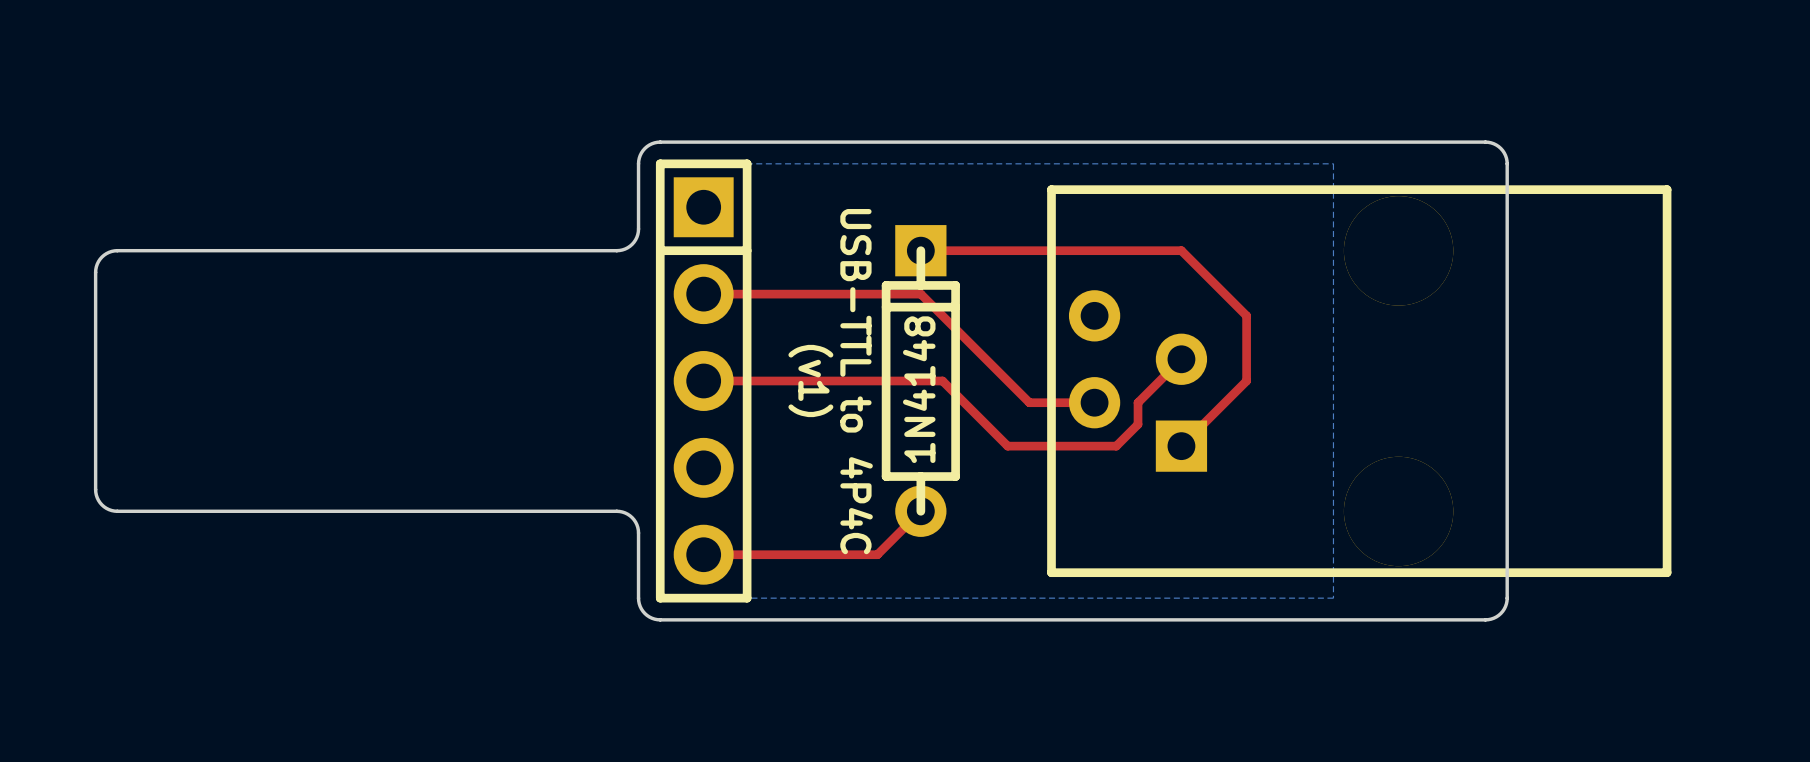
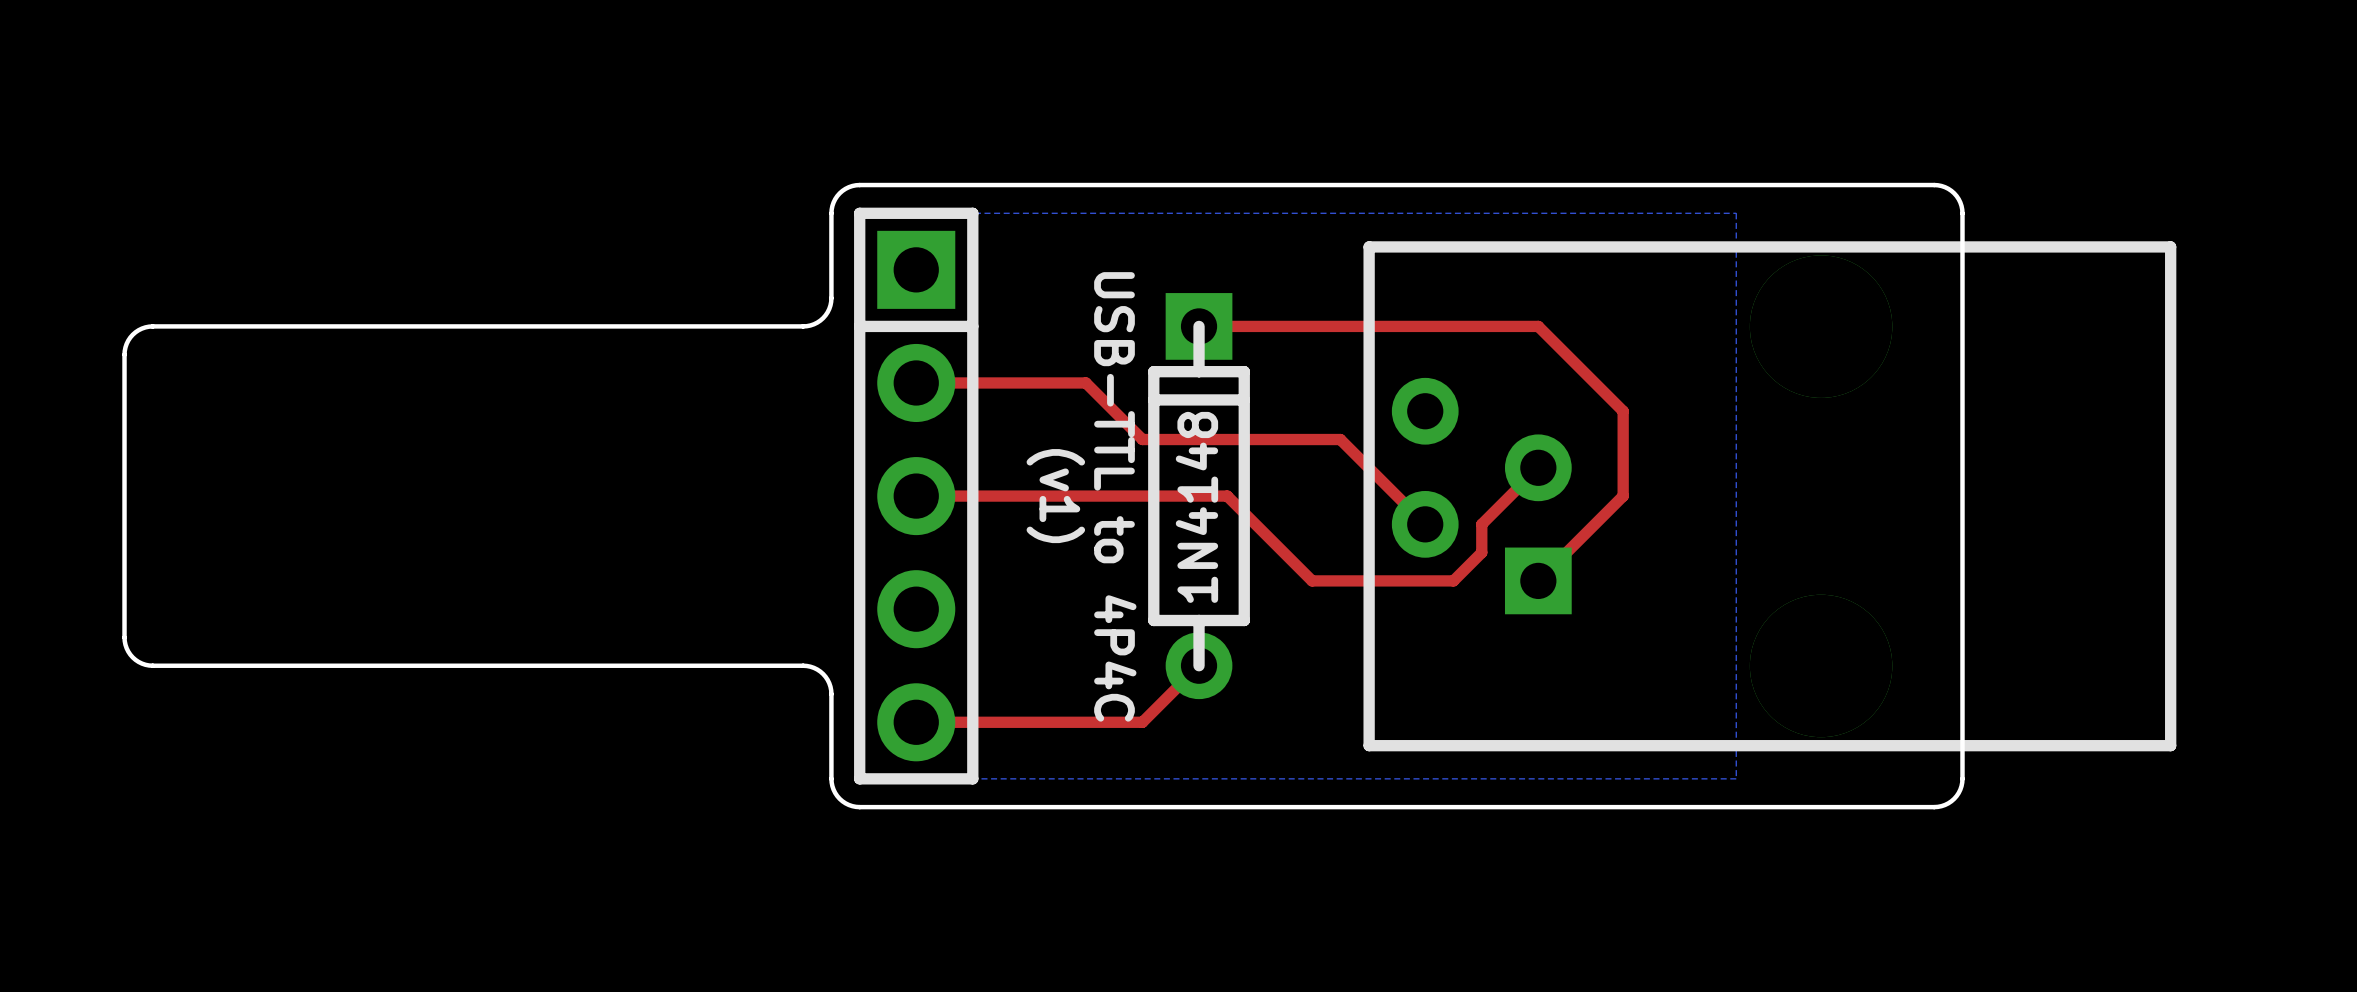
top track: (833, 294) (920, 294) (1029, 402) (1094, 402) -> (1085, 382) (1142, 439) (1340, 439) (1425, 524)

